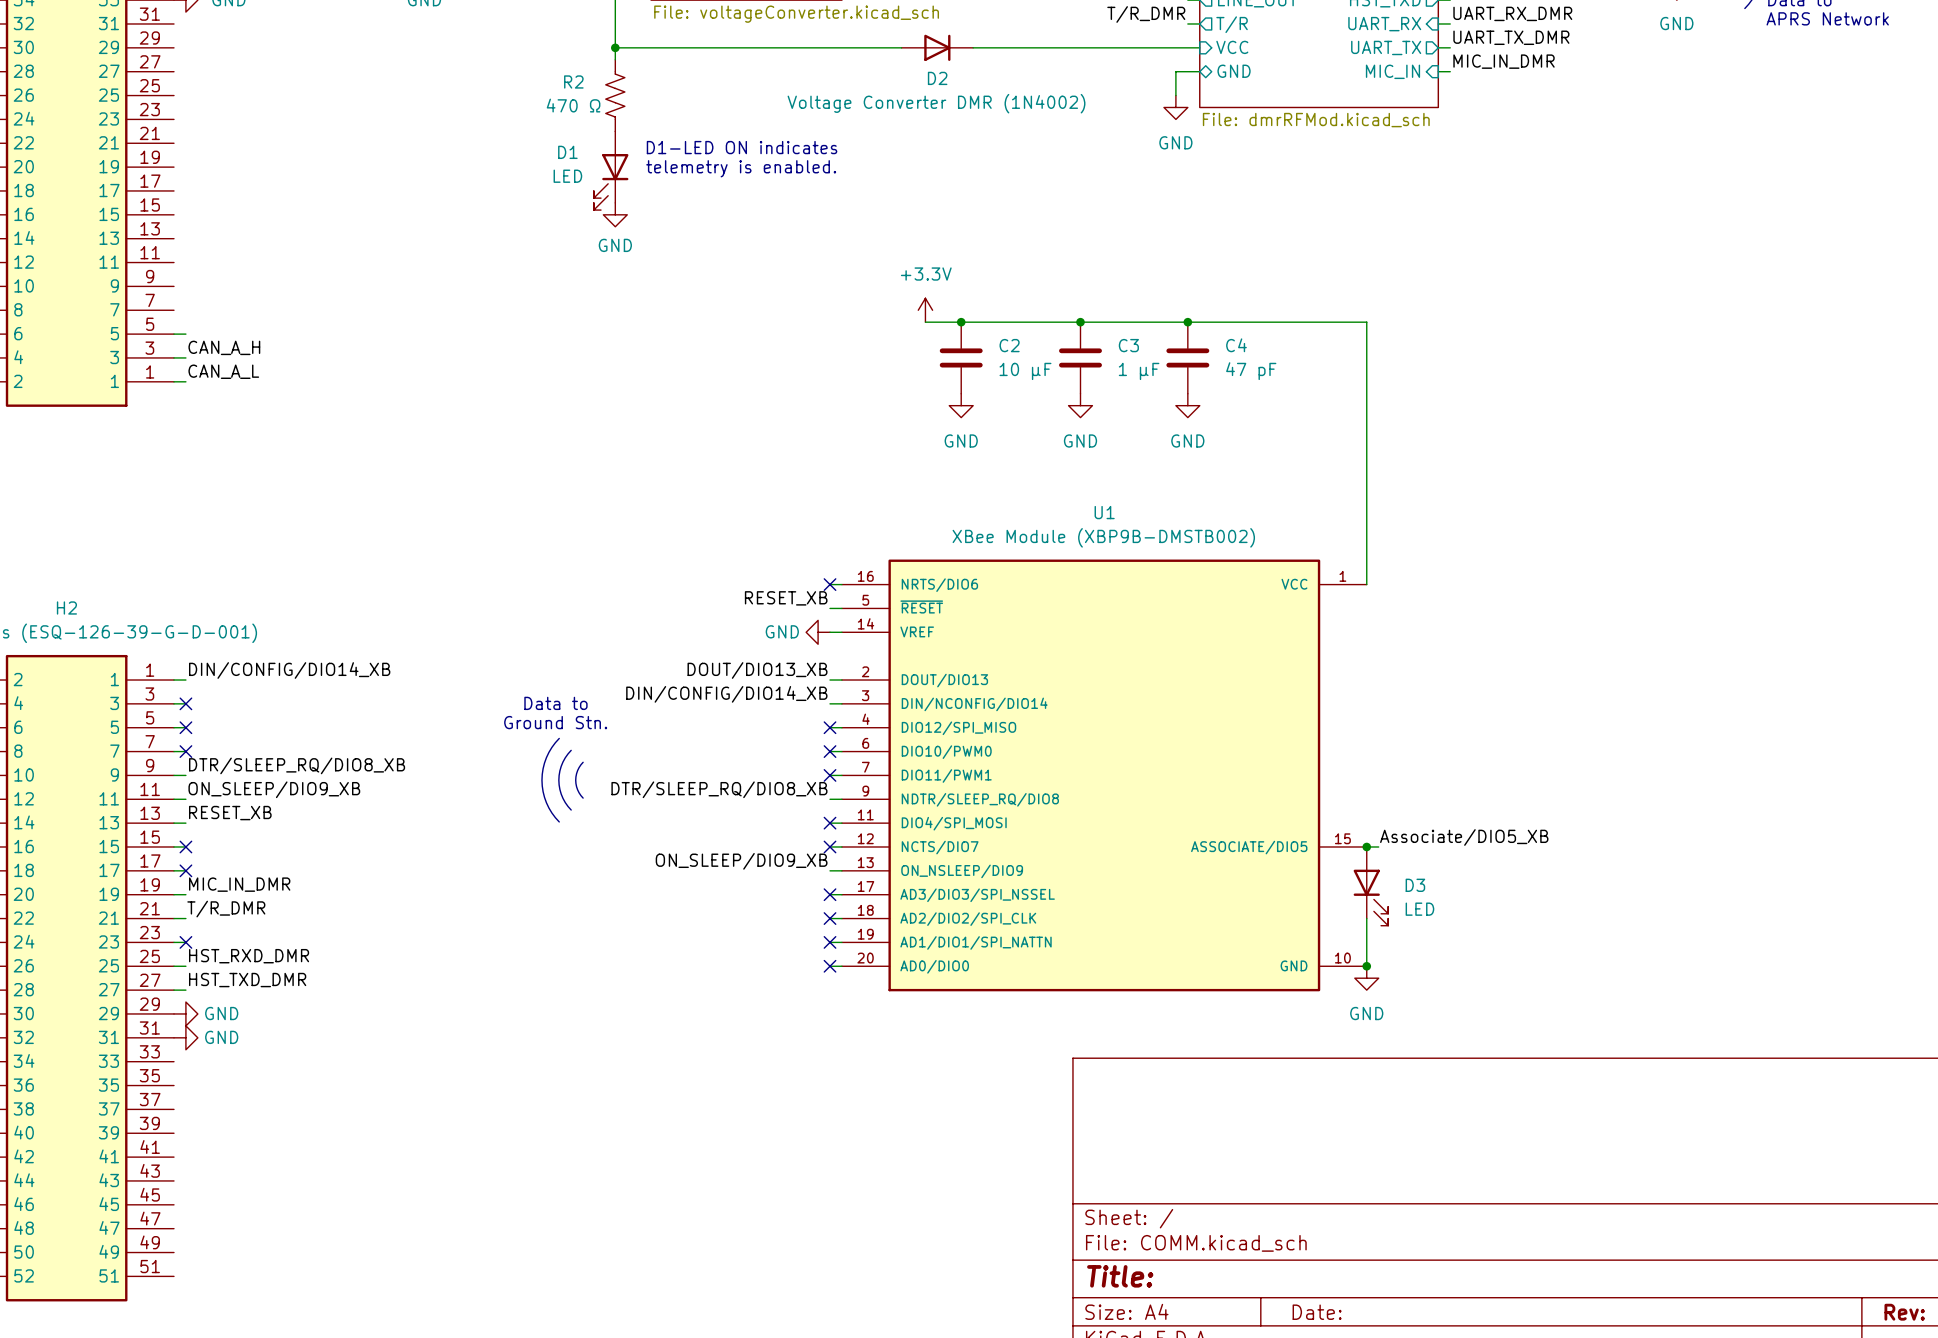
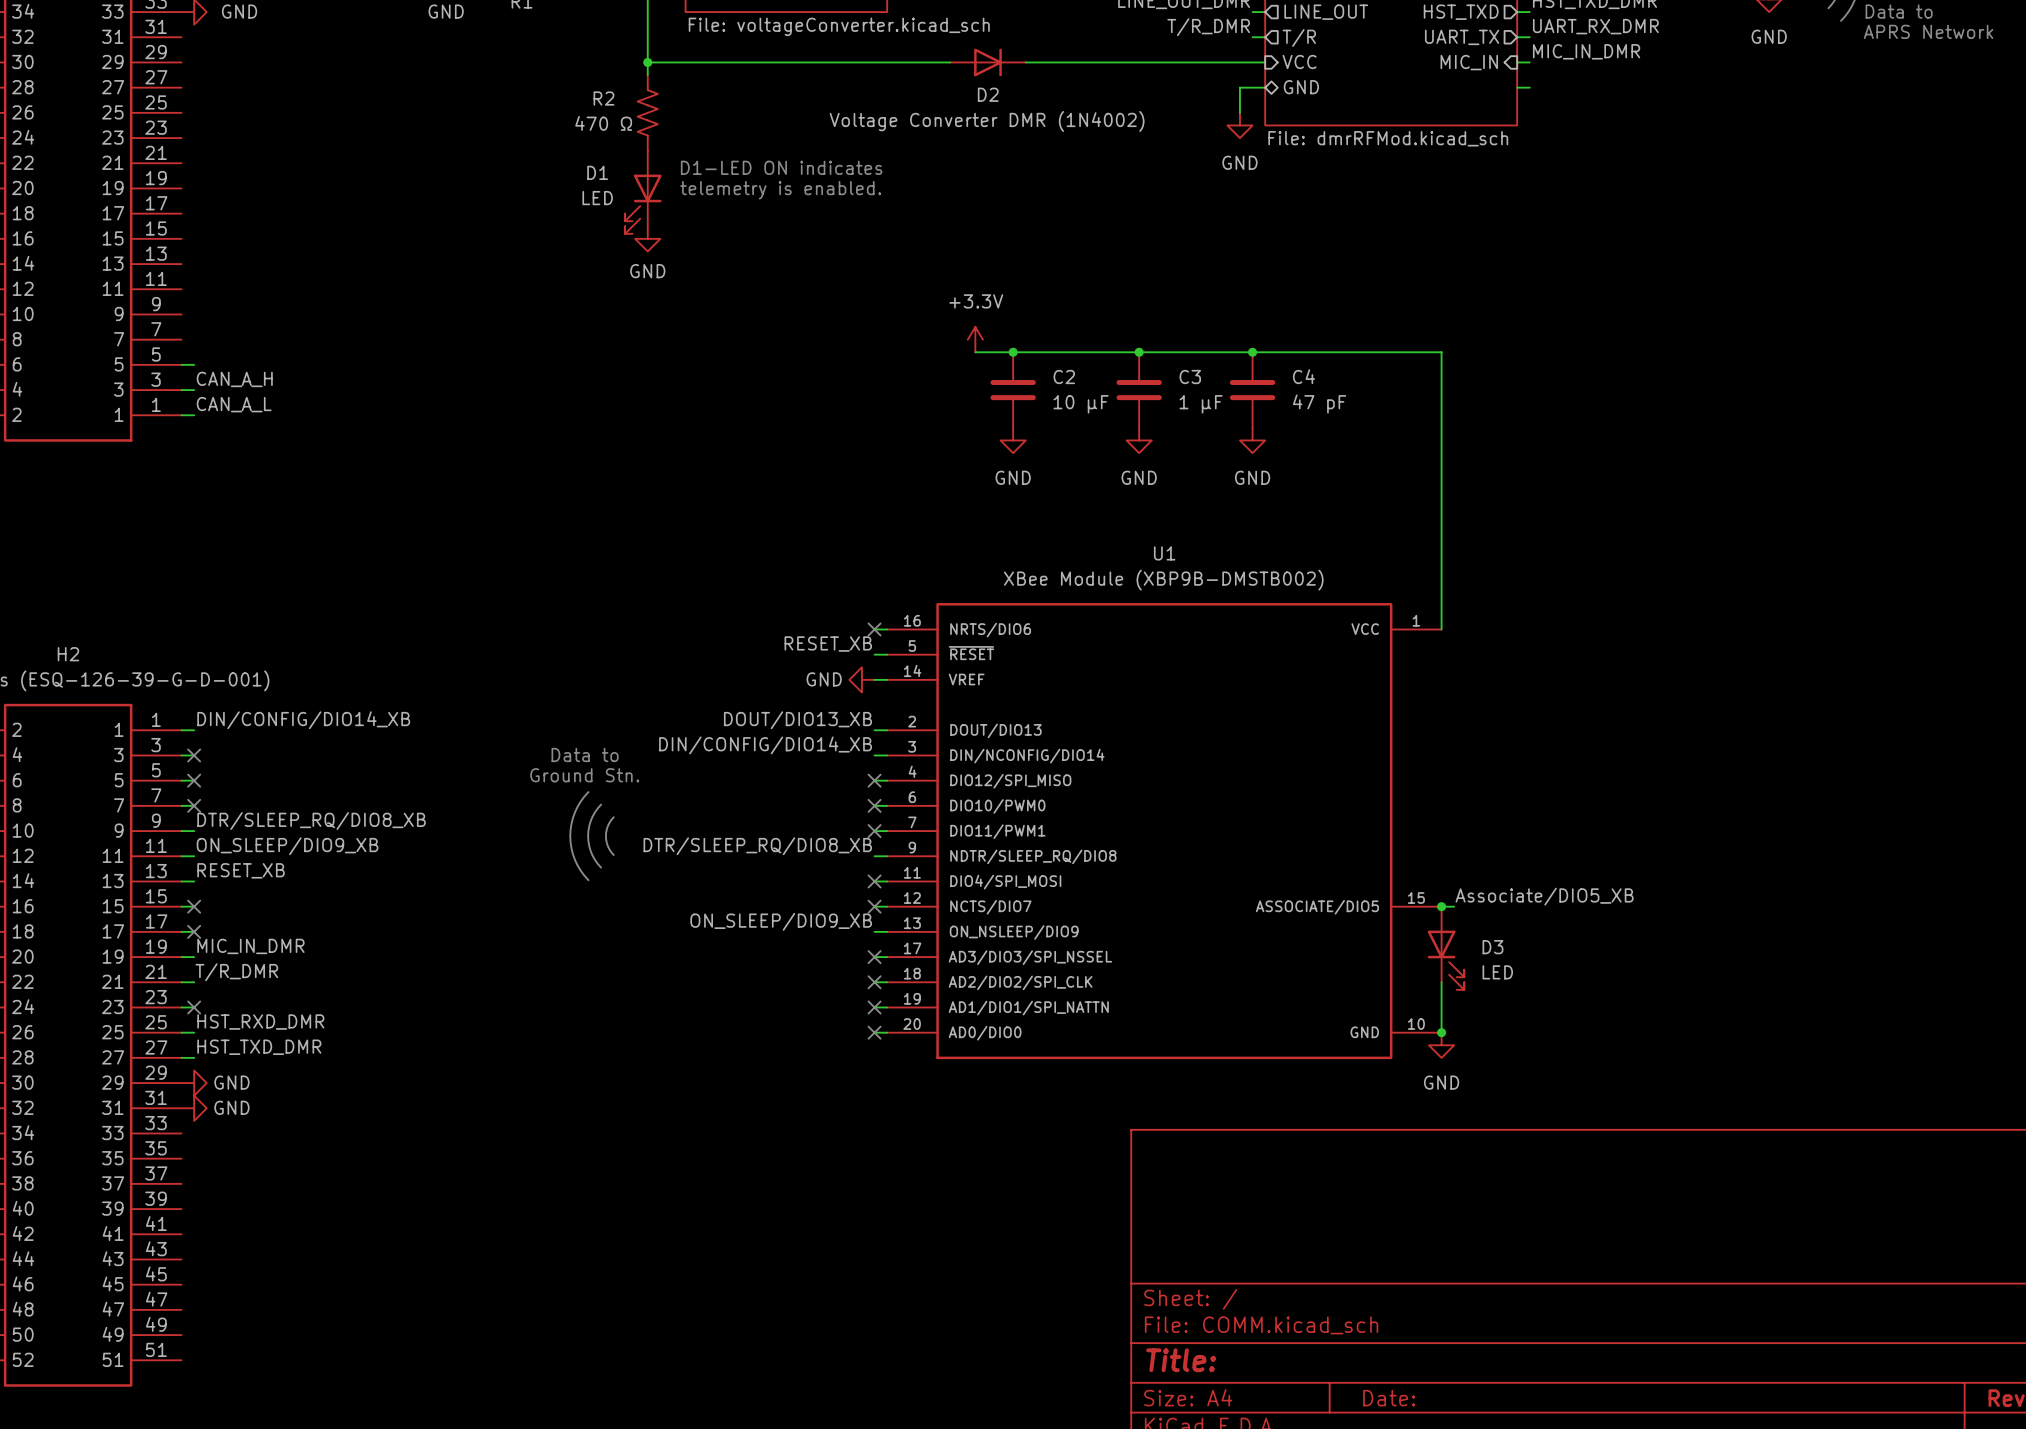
sheet pin shape: input (1384, 24) -> output (1462, 37)
sheet pin: UART_RX (1384, 24) -> UART_TX (1462, 37)
label: UART_TX_DMR (1511, 37) -> MIC_IN_DMR (1586, 51)
sheet pin shape: output (1386, 47) -> input (1469, 62)
sheet pin: UART_TX (1386, 47) -> MIC_IN (1469, 62)
label: MIC_IN_DMR (1504, 61) -> none
sheet pin: MIC_IN (1392, 71) -> none

